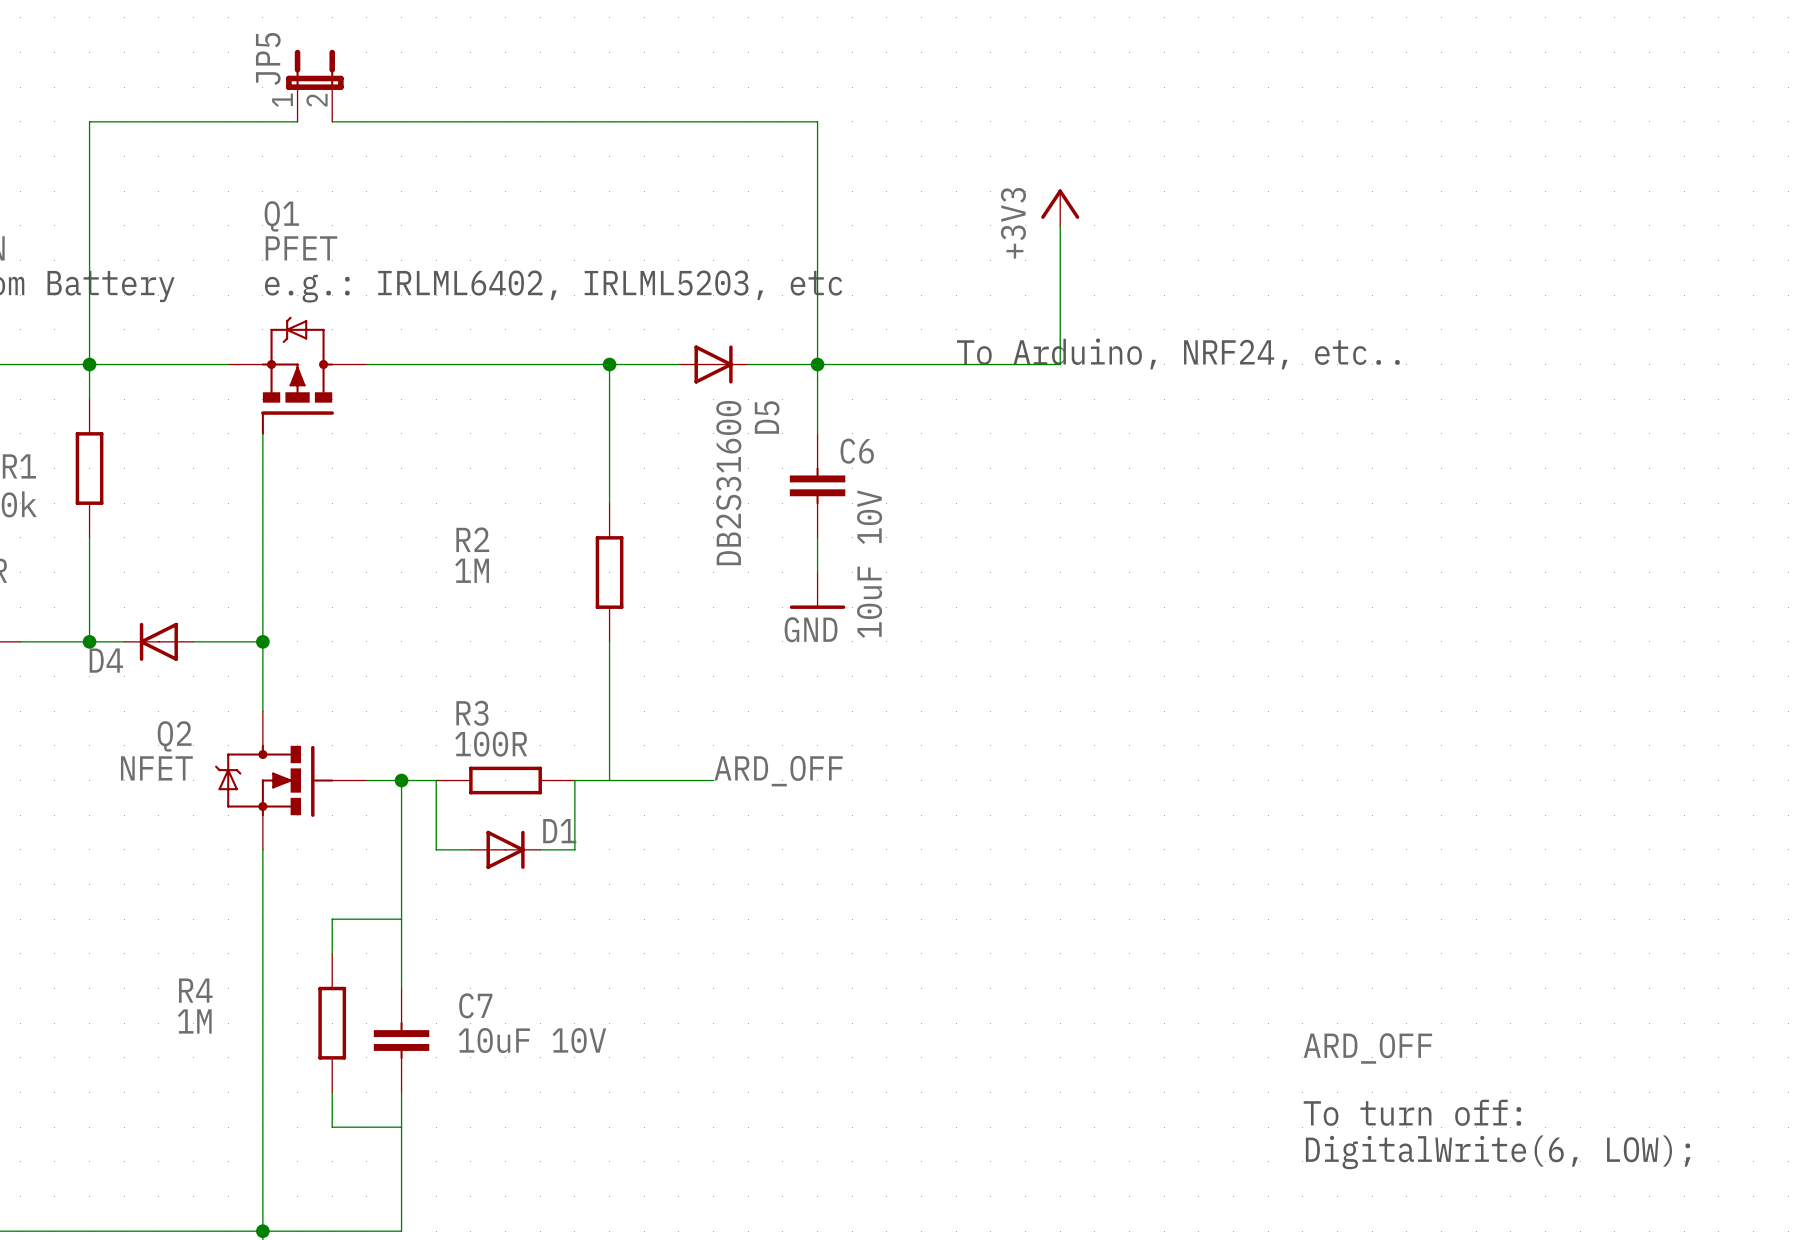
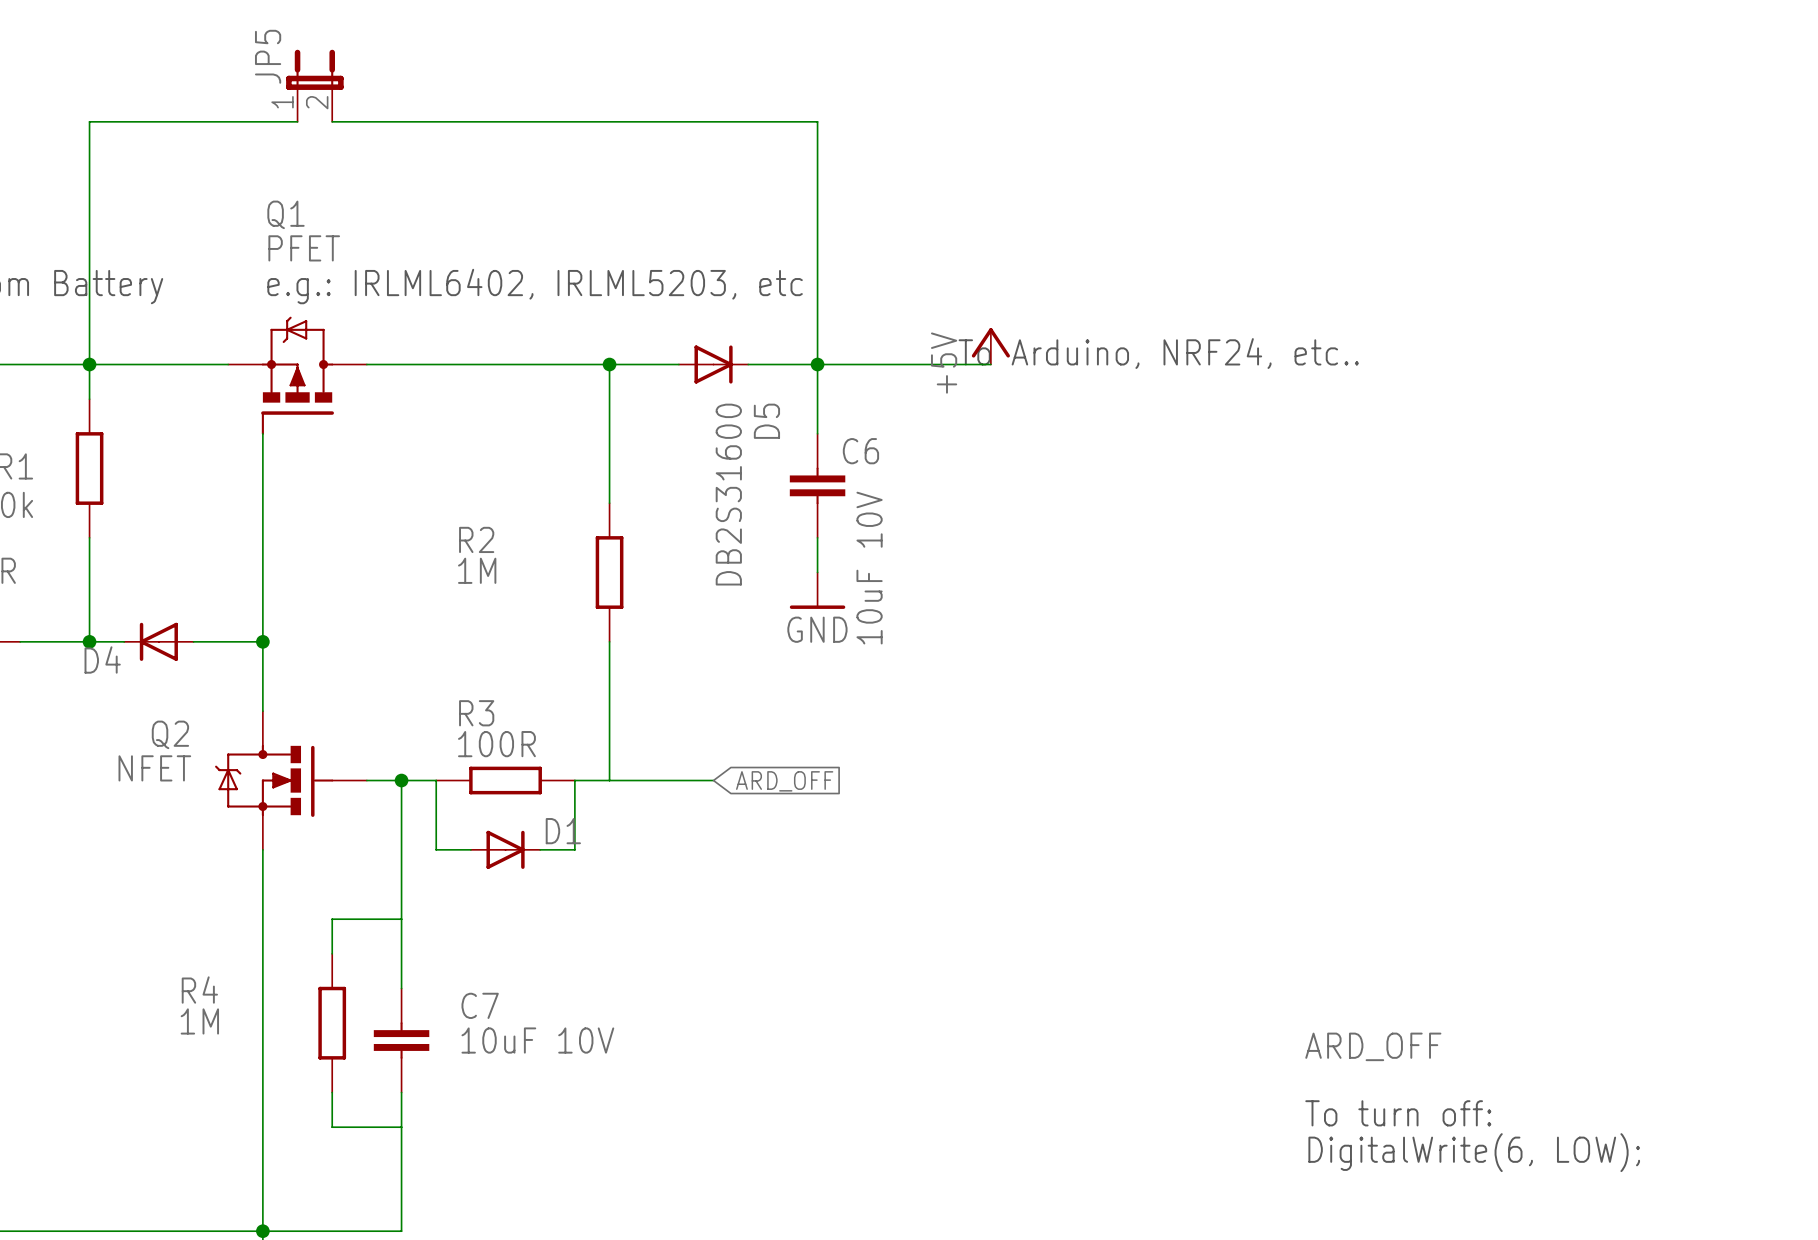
power symbol: +3V3 (1060, 207) -> none
wire: (1060, 225) (1060, 364) (990, 364) -> none
power symbol: none -> +5V (990, 346)
label: ARD_OFF (778, 771) -> none
global label: none -> ARD_OFF (784, 781)

